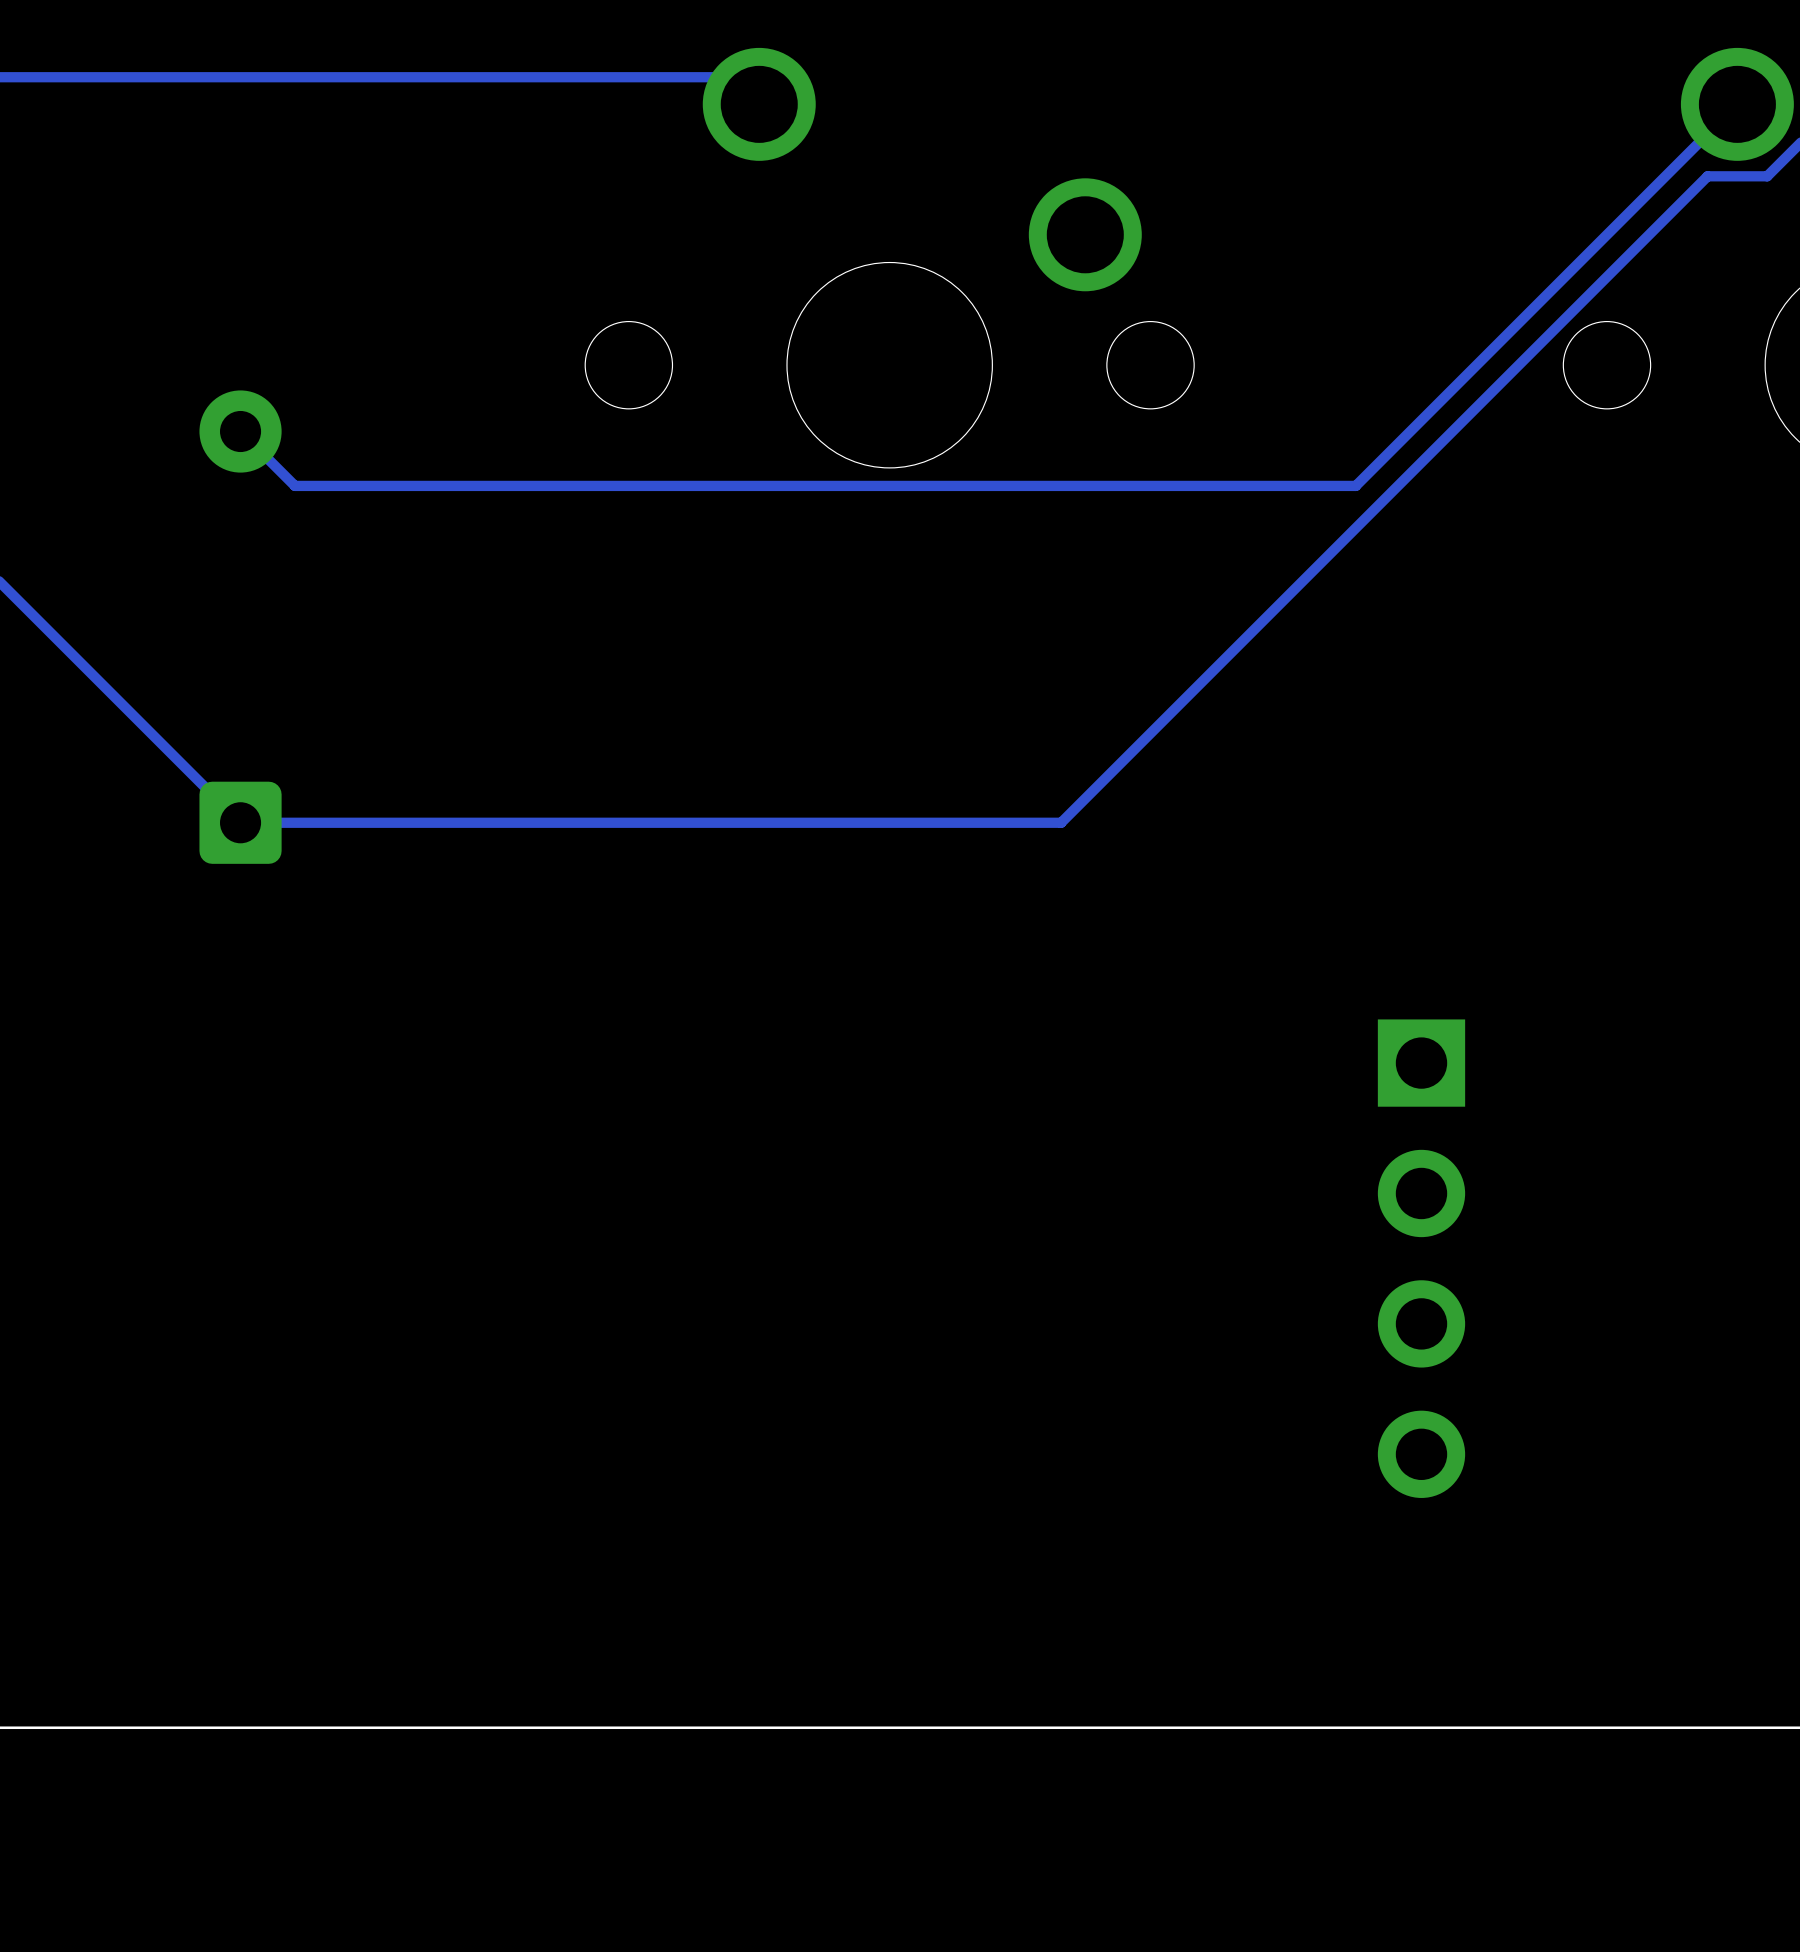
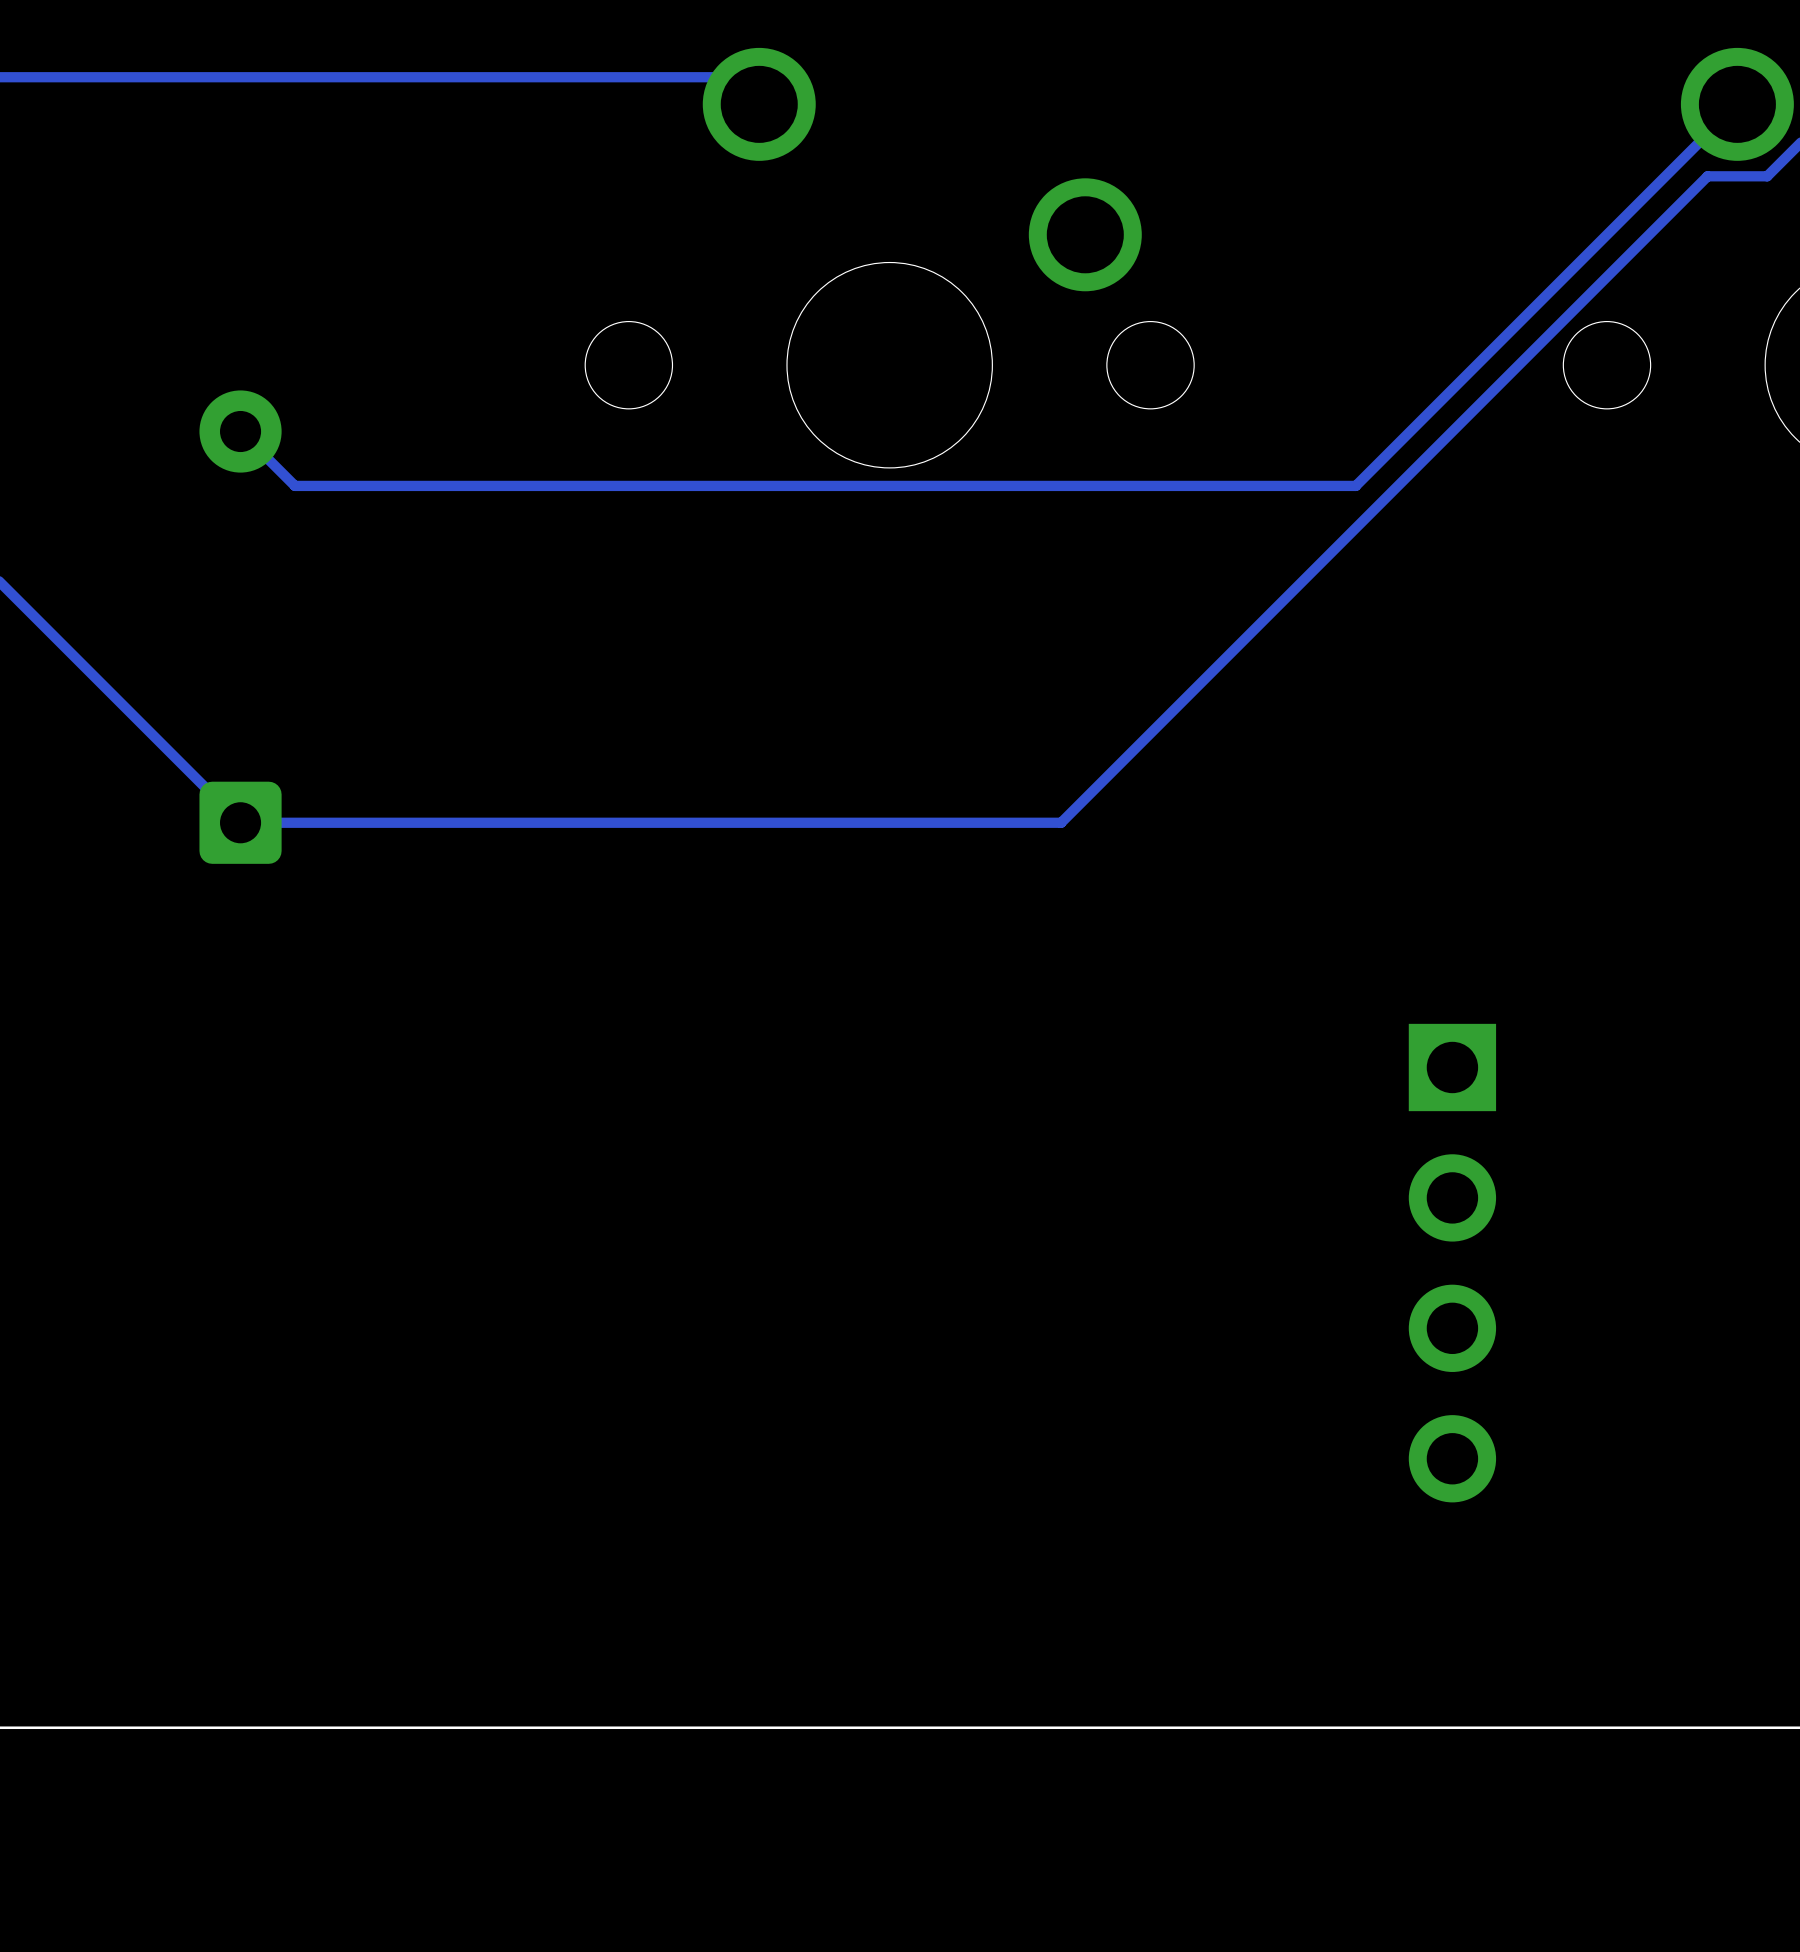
part position: (1421, 1258) -> (1452, 1263)

